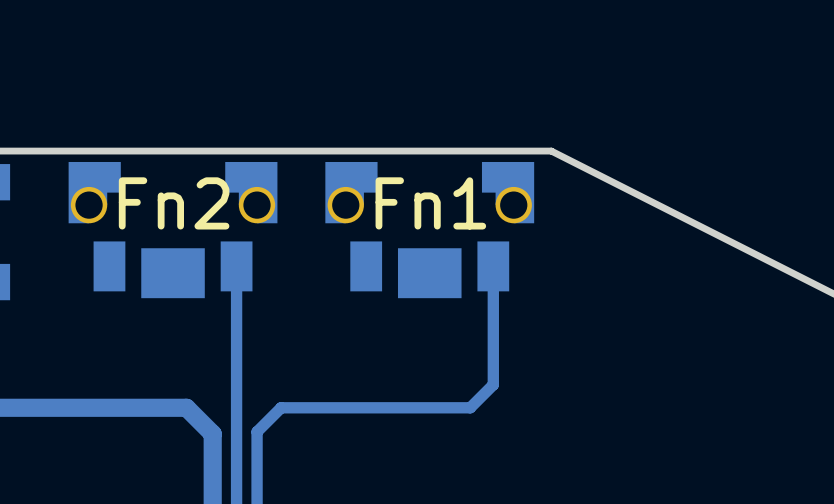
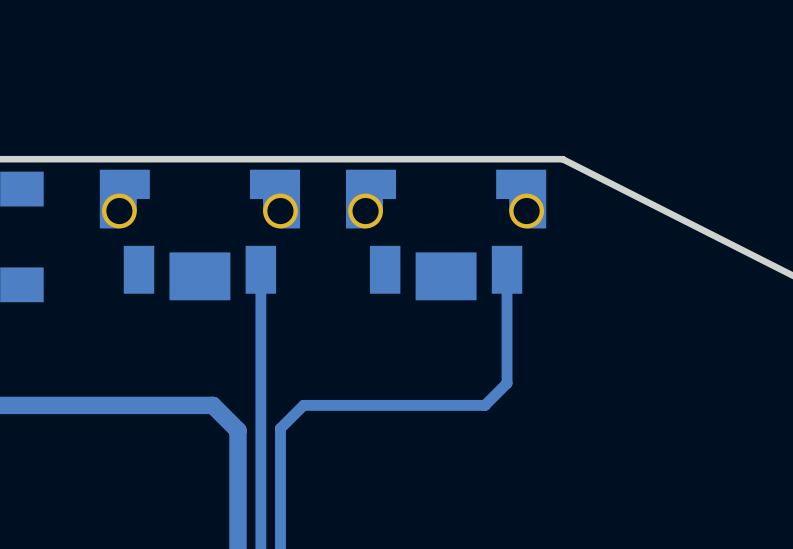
text: Fn2 (174, 203) -> none
text: Fn1 (430, 203) -> none

